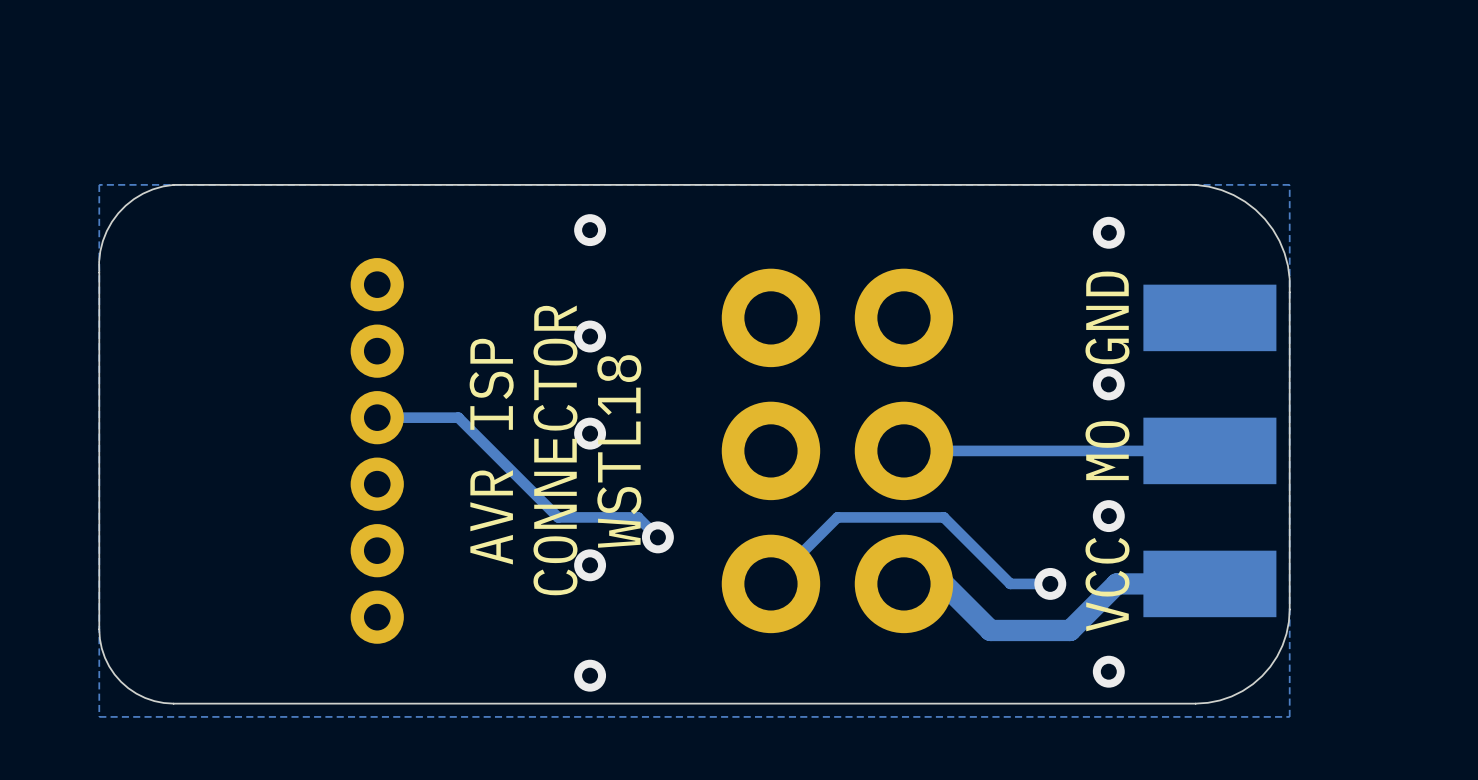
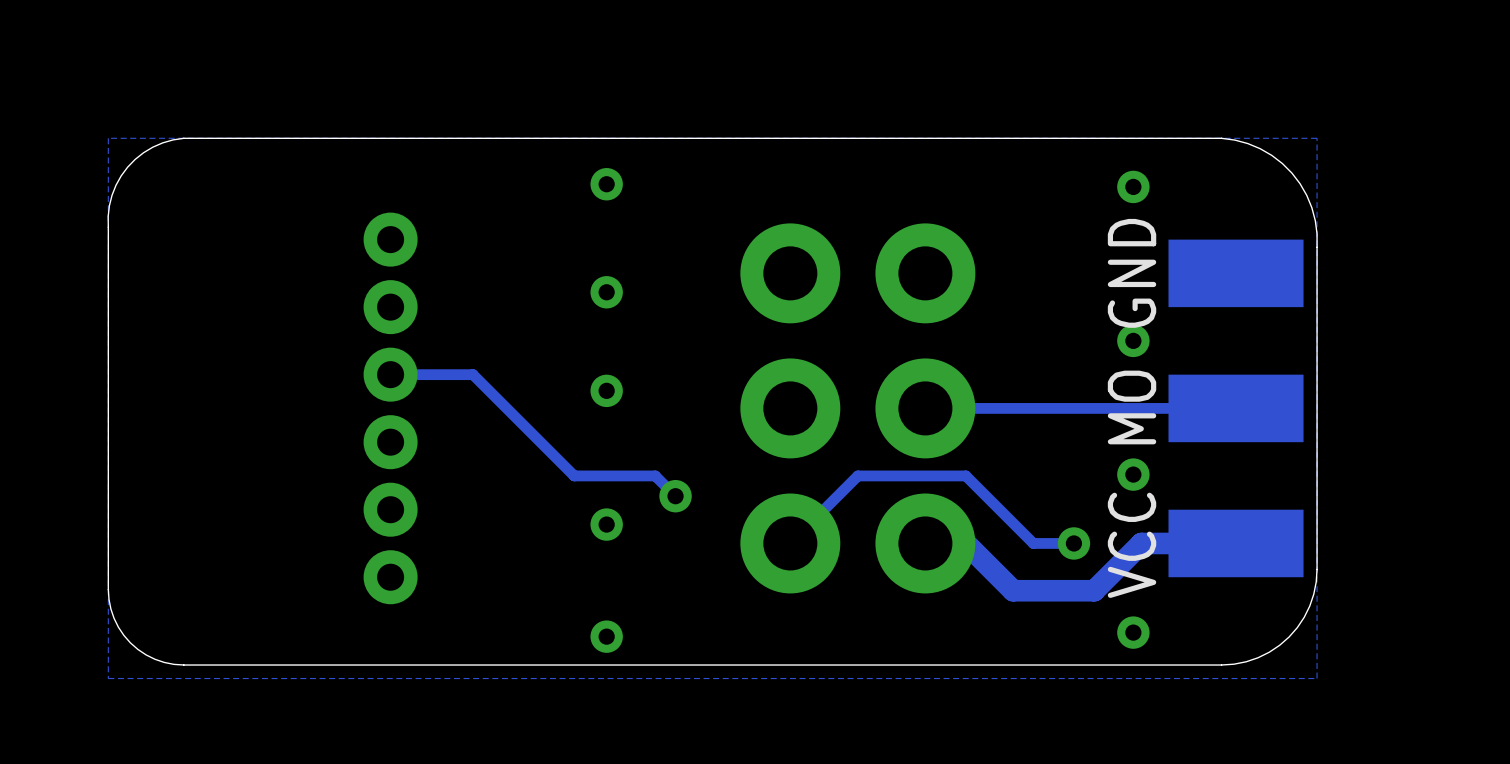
text: CONNECTOR (555, 450) -> none
text: AVR ISP (491, 451) -> none
text: WSTL18 (619, 451) -> none

